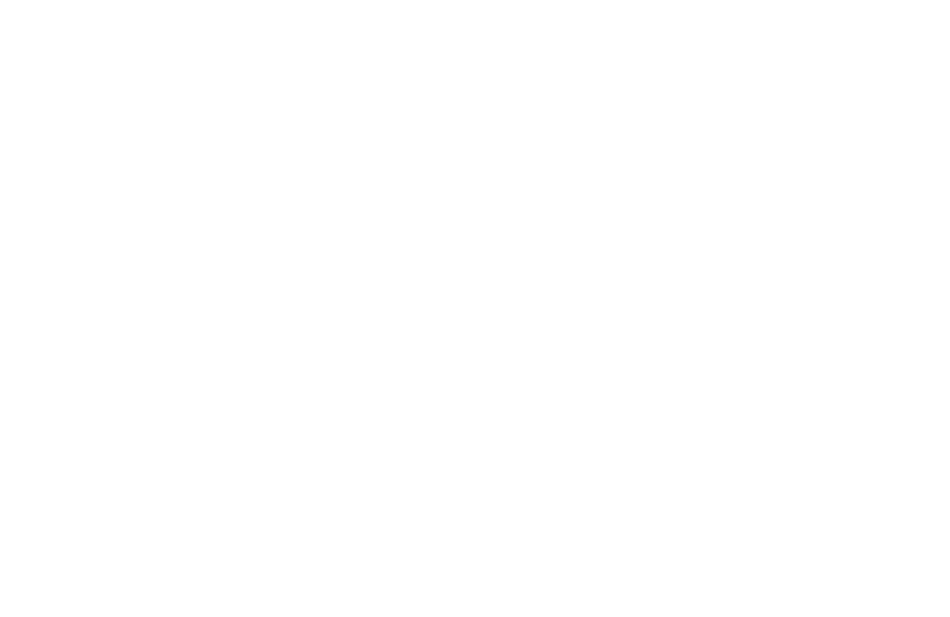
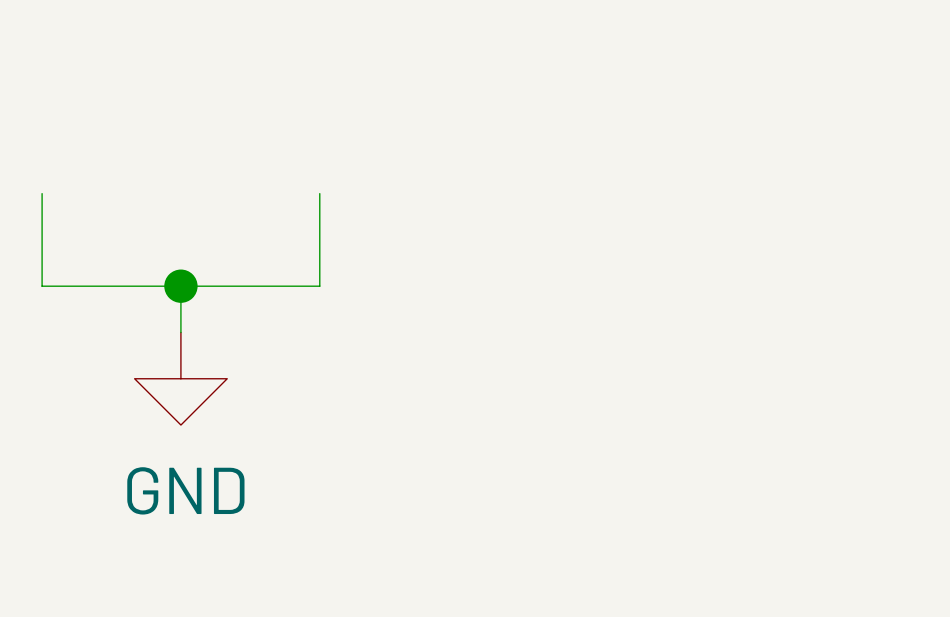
wire: none -> (42, 193) (42, 286) (319, 286) (319, 193)
wire: none -> (180, 286) (180, 332)
junction: none -> (180, 286)
power symbol: none -> GND (180, 378)

